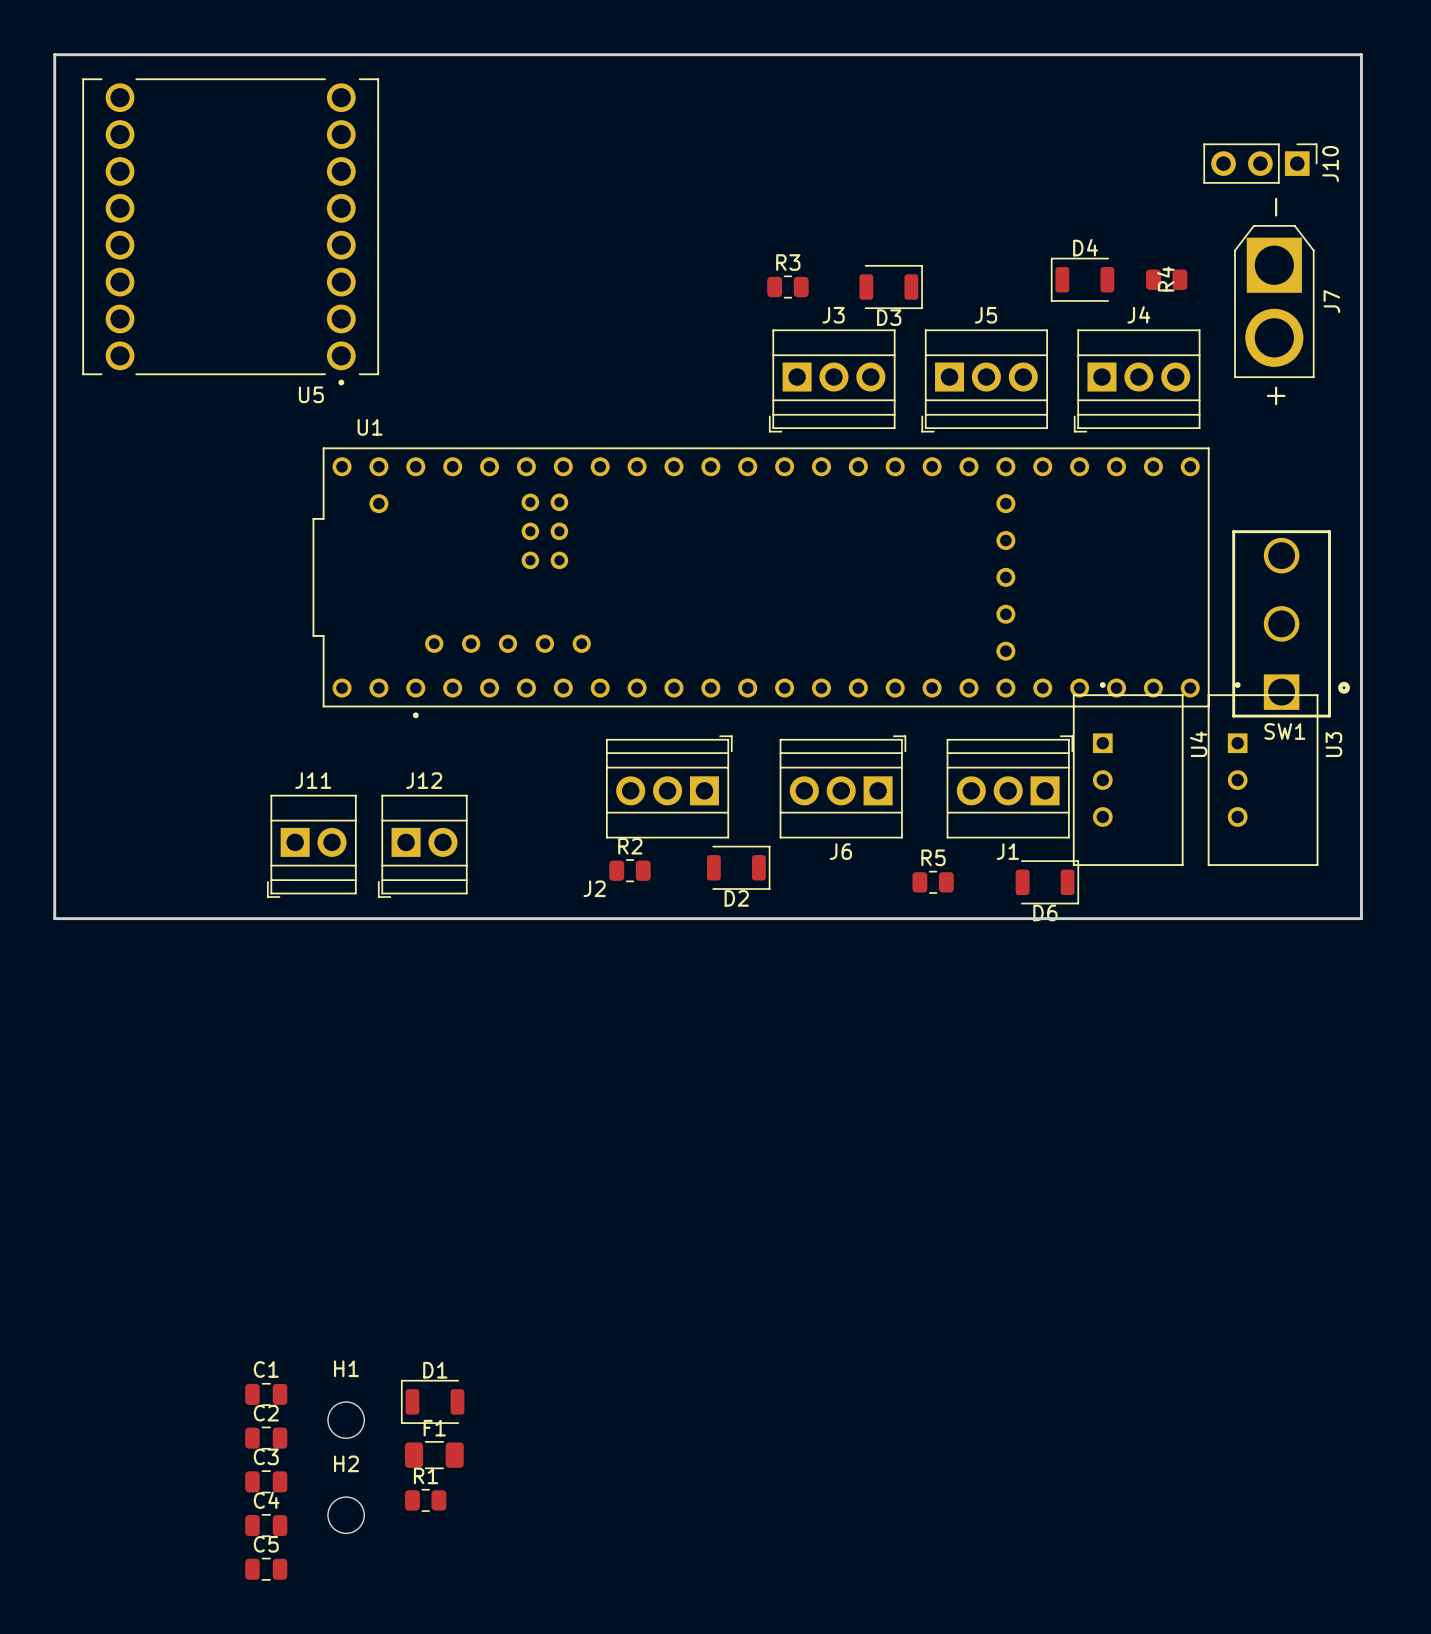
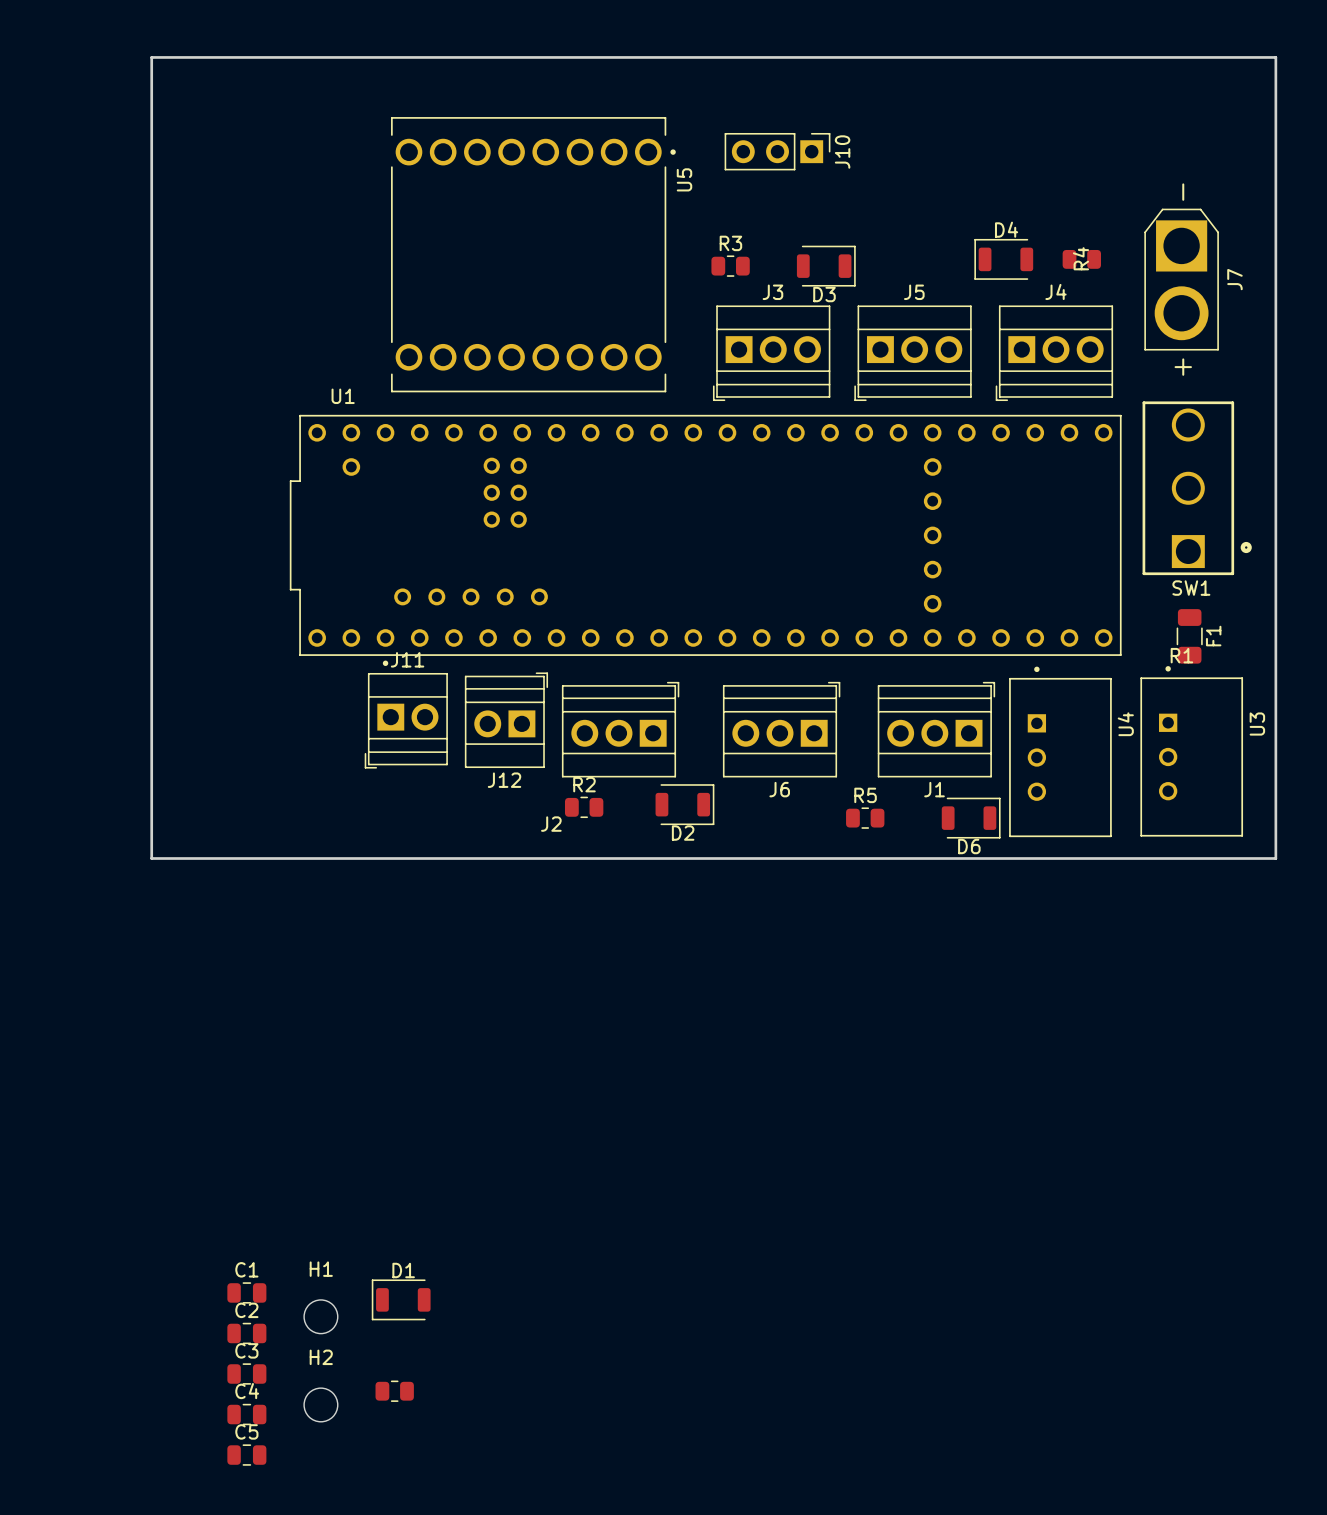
board edge: (54, 54) (1361, 54) (1361, 918) (54, 918) (54, 54) -> (151, 57) (151, 858) (1275, 858) (1275, 57) (151, 57)
J10 position: (1260, 163) -> (777, 151)
U5 rotation: 0° (230, 231) -> 90° counterclockwise (533, 254)
U5 position: (230, 231) -> (533, 254)
SW1 position: (1290, 623) -> (1196, 488)
U4 position: (1128, 774) -> (1060, 751)
U3 position: (1263, 774) -> (1191, 751)
J11 position: (311, 846) -> (406, 720)
J12 rotation: 0° (422, 846) -> 180° (506, 720)
J12 position: (422, 846) -> (506, 720)
F1 rotation: 0° (434, 1455) -> 90° clockwise (1189, 636)
F1 position: (434, 1455) -> (1189, 636)
R1 name position: R1 (426, 1475) -> R1 (1181, 655)

